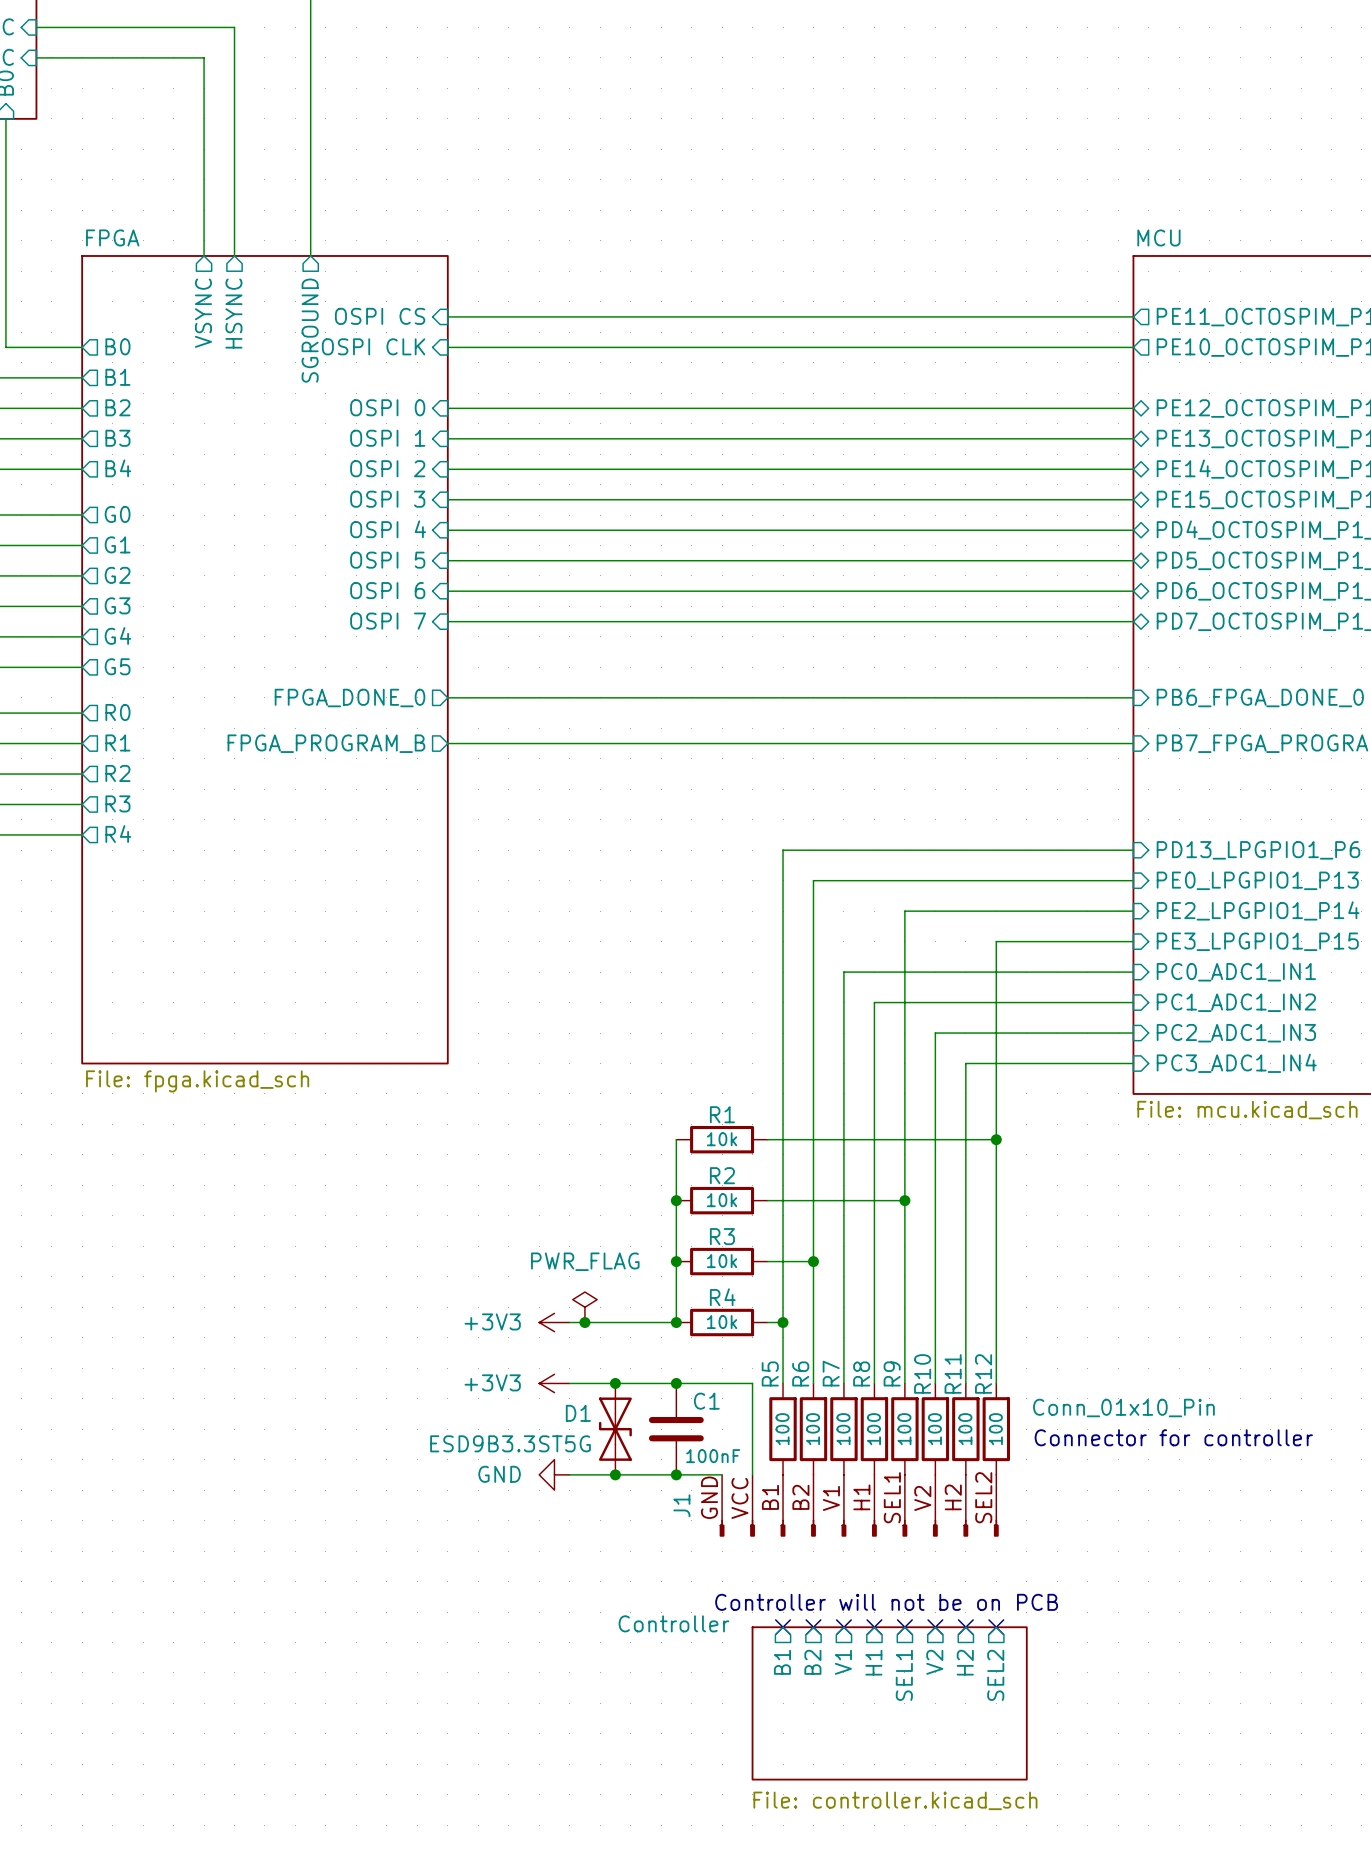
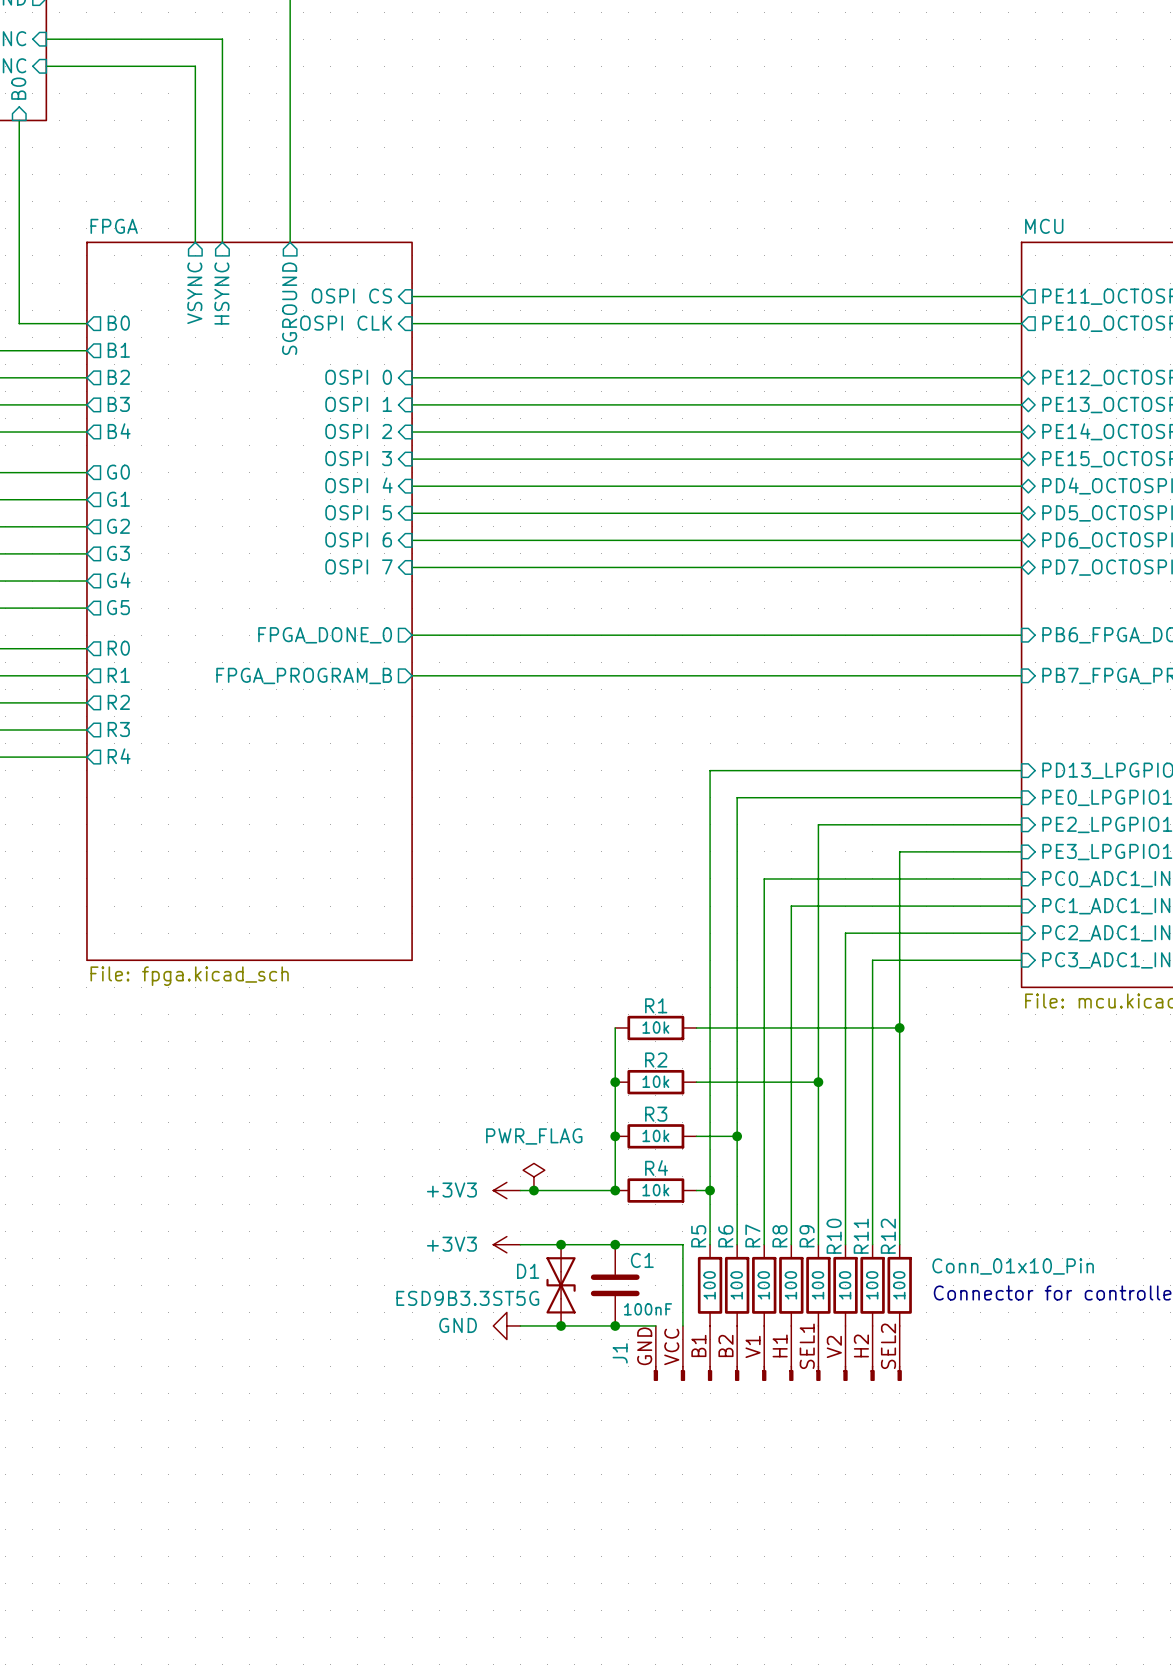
text: Controller will not be on PCB (886, 1602) -> none
no-connect mark: (783, 1627) -> none
no-connect mark: (813, 1627) -> none
no-connect mark: (843, 1627) -> none
no-connect mark: (874, 1627) -> none
no-connect mark: (904, 1627) -> none
no-connect mark: (935, 1627) -> none
no-connect mark: (965, 1627) -> none
no-connect mark: (996, 1627) -> none
sheet pin: B1 (782, 1662) -> none
sheet pin: B2 (812, 1662) -> none
sheet pin: V1 (843, 1662) -> none
sheet pin: H1 (873, 1662) -> none
sheet pin: V2 (934, 1662) -> none
sheet pin: H2 (965, 1662) -> none
sheet pin: SEL1 (904, 1675) -> none
sheet pin: SEL2 (995, 1675) -> none
sheet Controller: File: controller.kicad_sch (889, 1703) -> none

